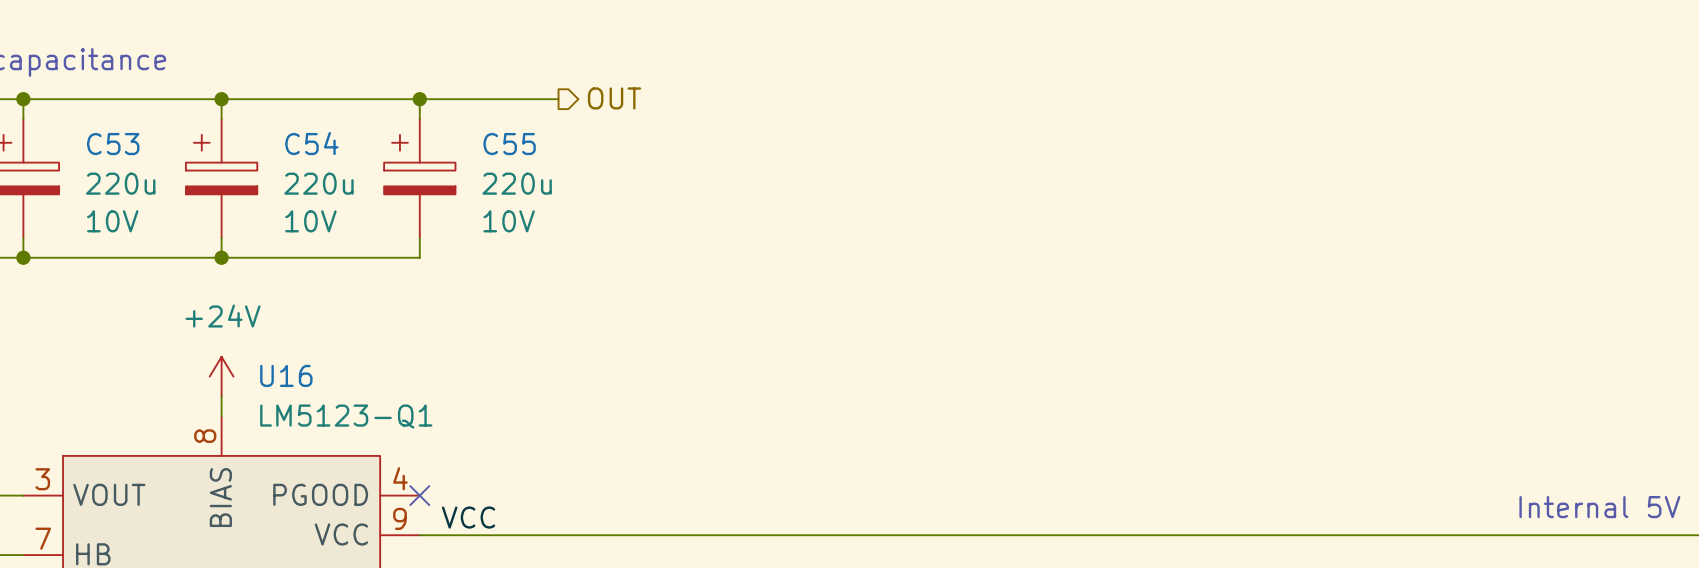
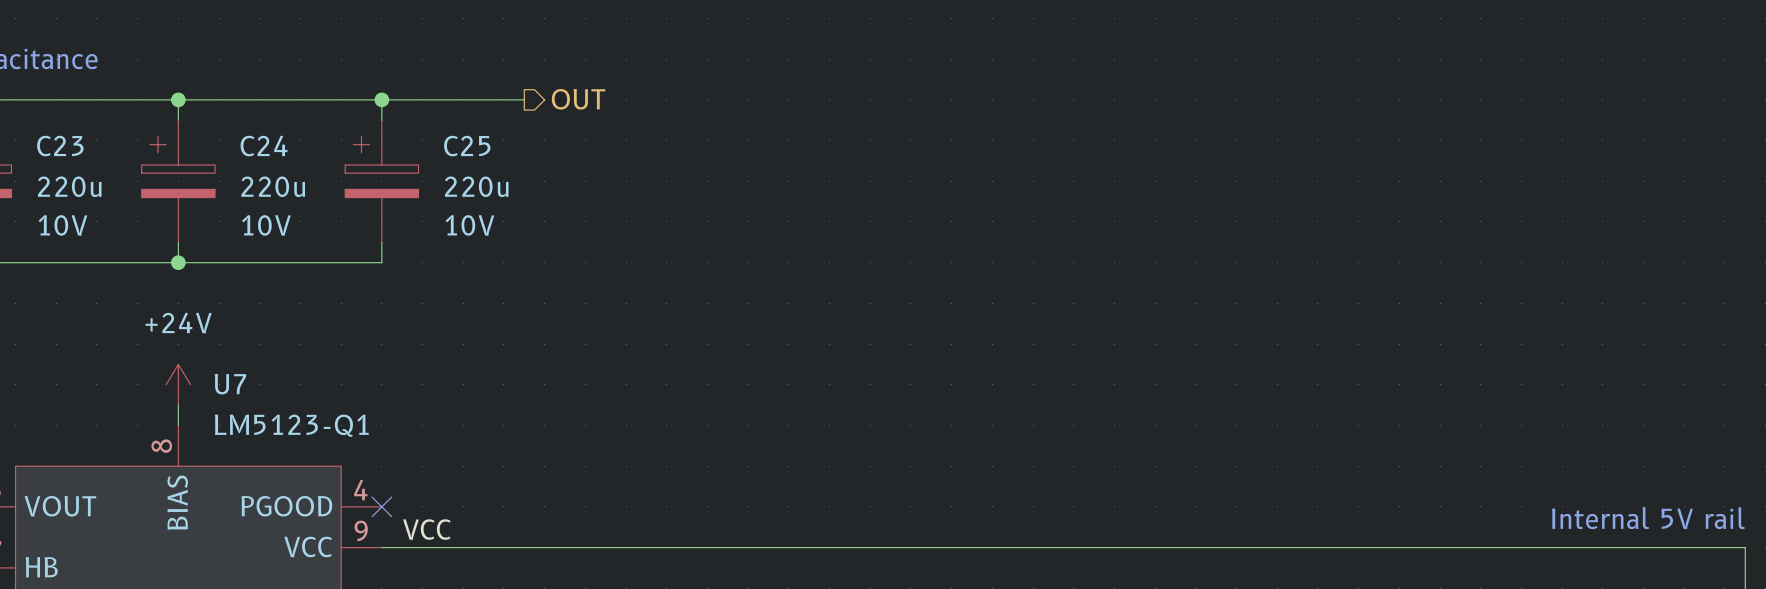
C54 name: C54 (311, 143) -> C24 (264, 146)
C53 name: C53 (113, 144) -> C23 (60, 146)
C55 name: C55 (509, 144) -> C25 (467, 146)
U16 name: U16 (286, 375) -> U7 (230, 384)

